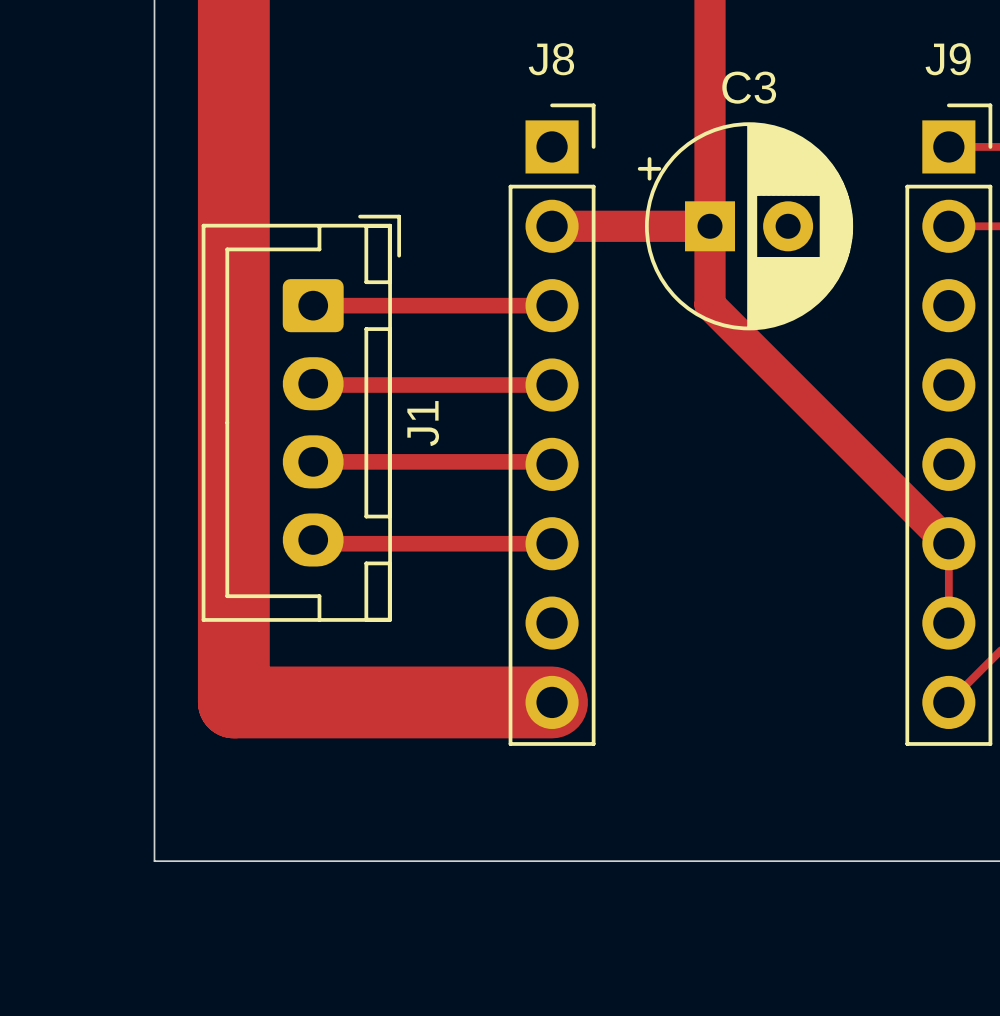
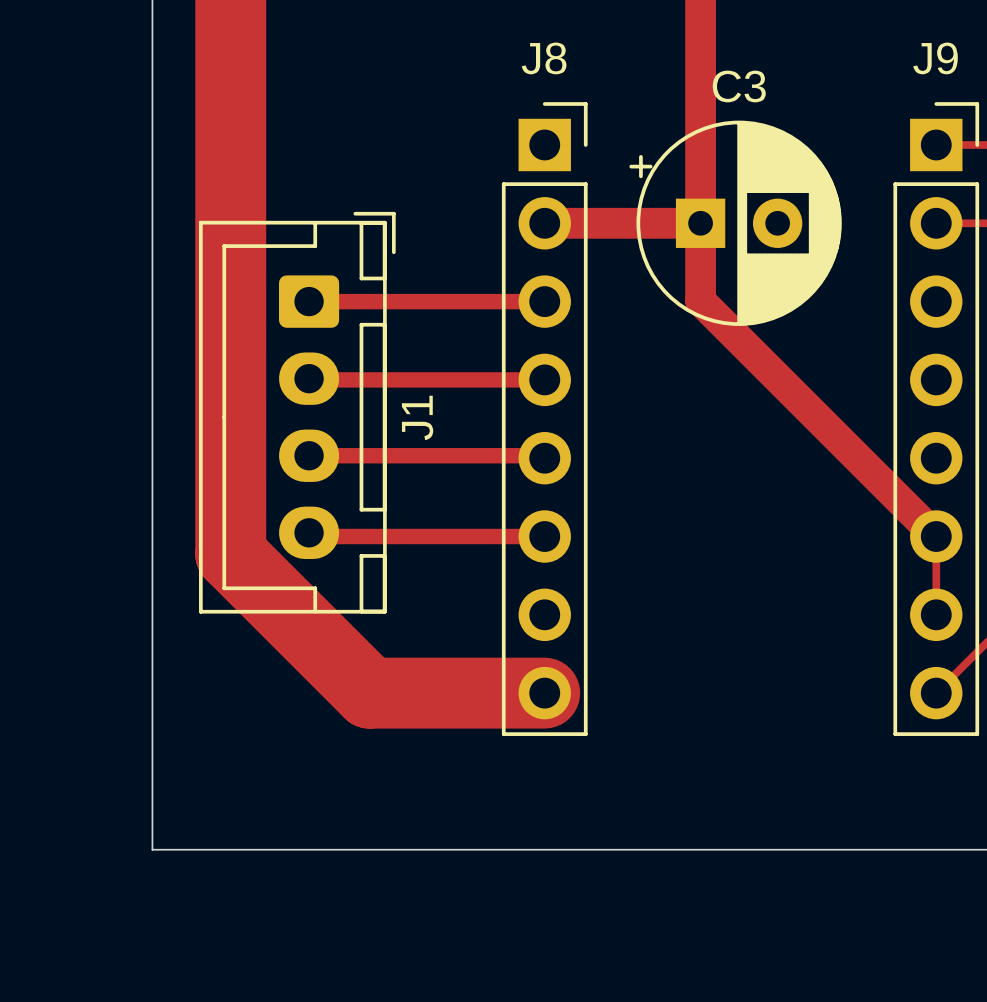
track: (233, 561) (233, 702) (374, 702) -> (230, 554) (369, 693)

